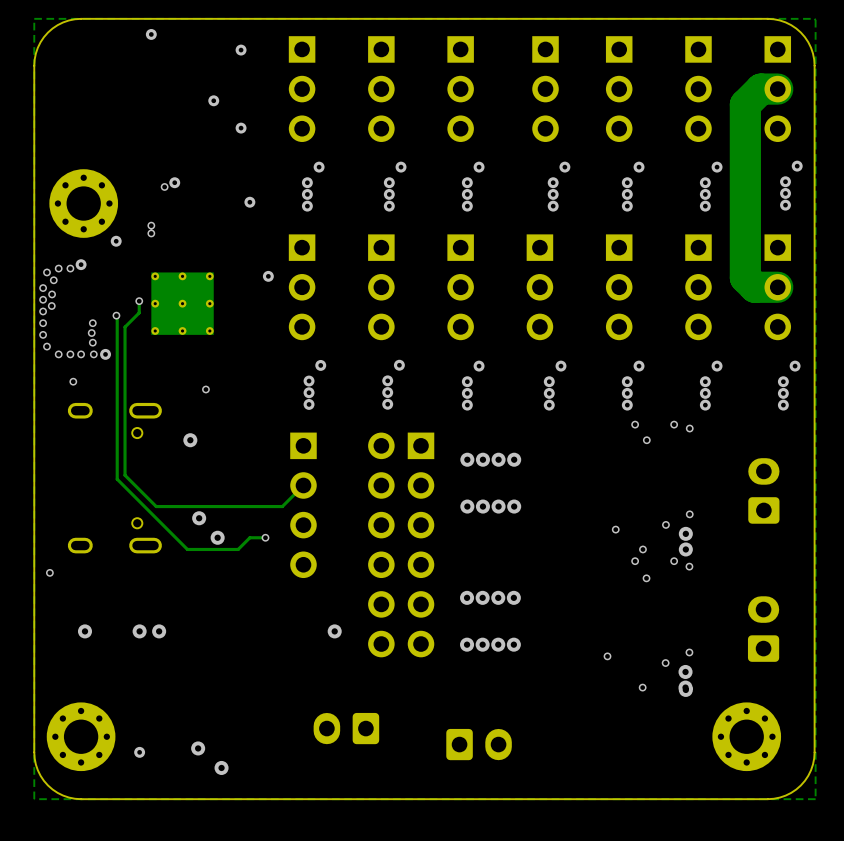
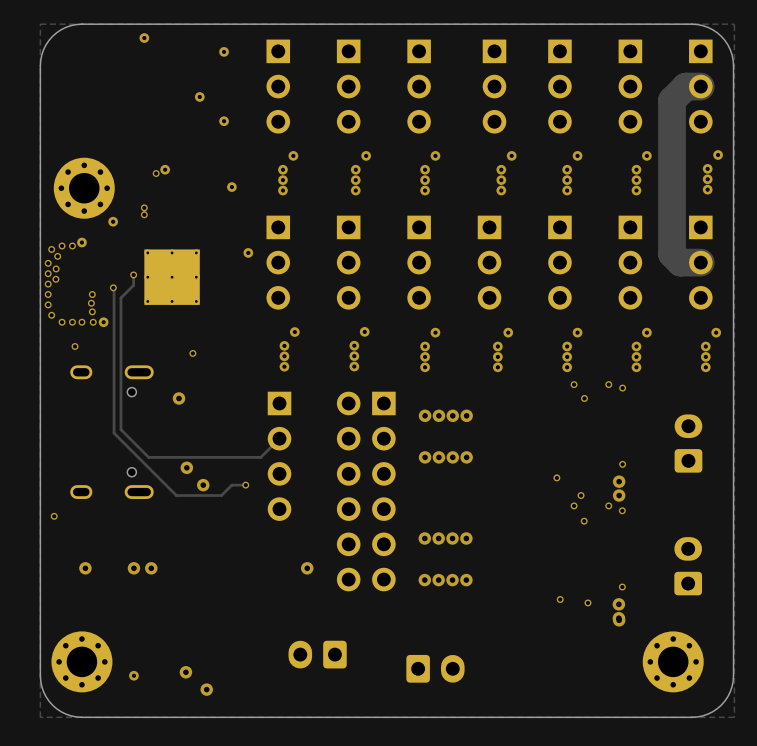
via: (665, 524) -> none
via: (607, 656) -> none
via: (665, 663) -> none
via: none -> (560, 599)
via: none -> (587, 602)
via: (642, 687) -> none

